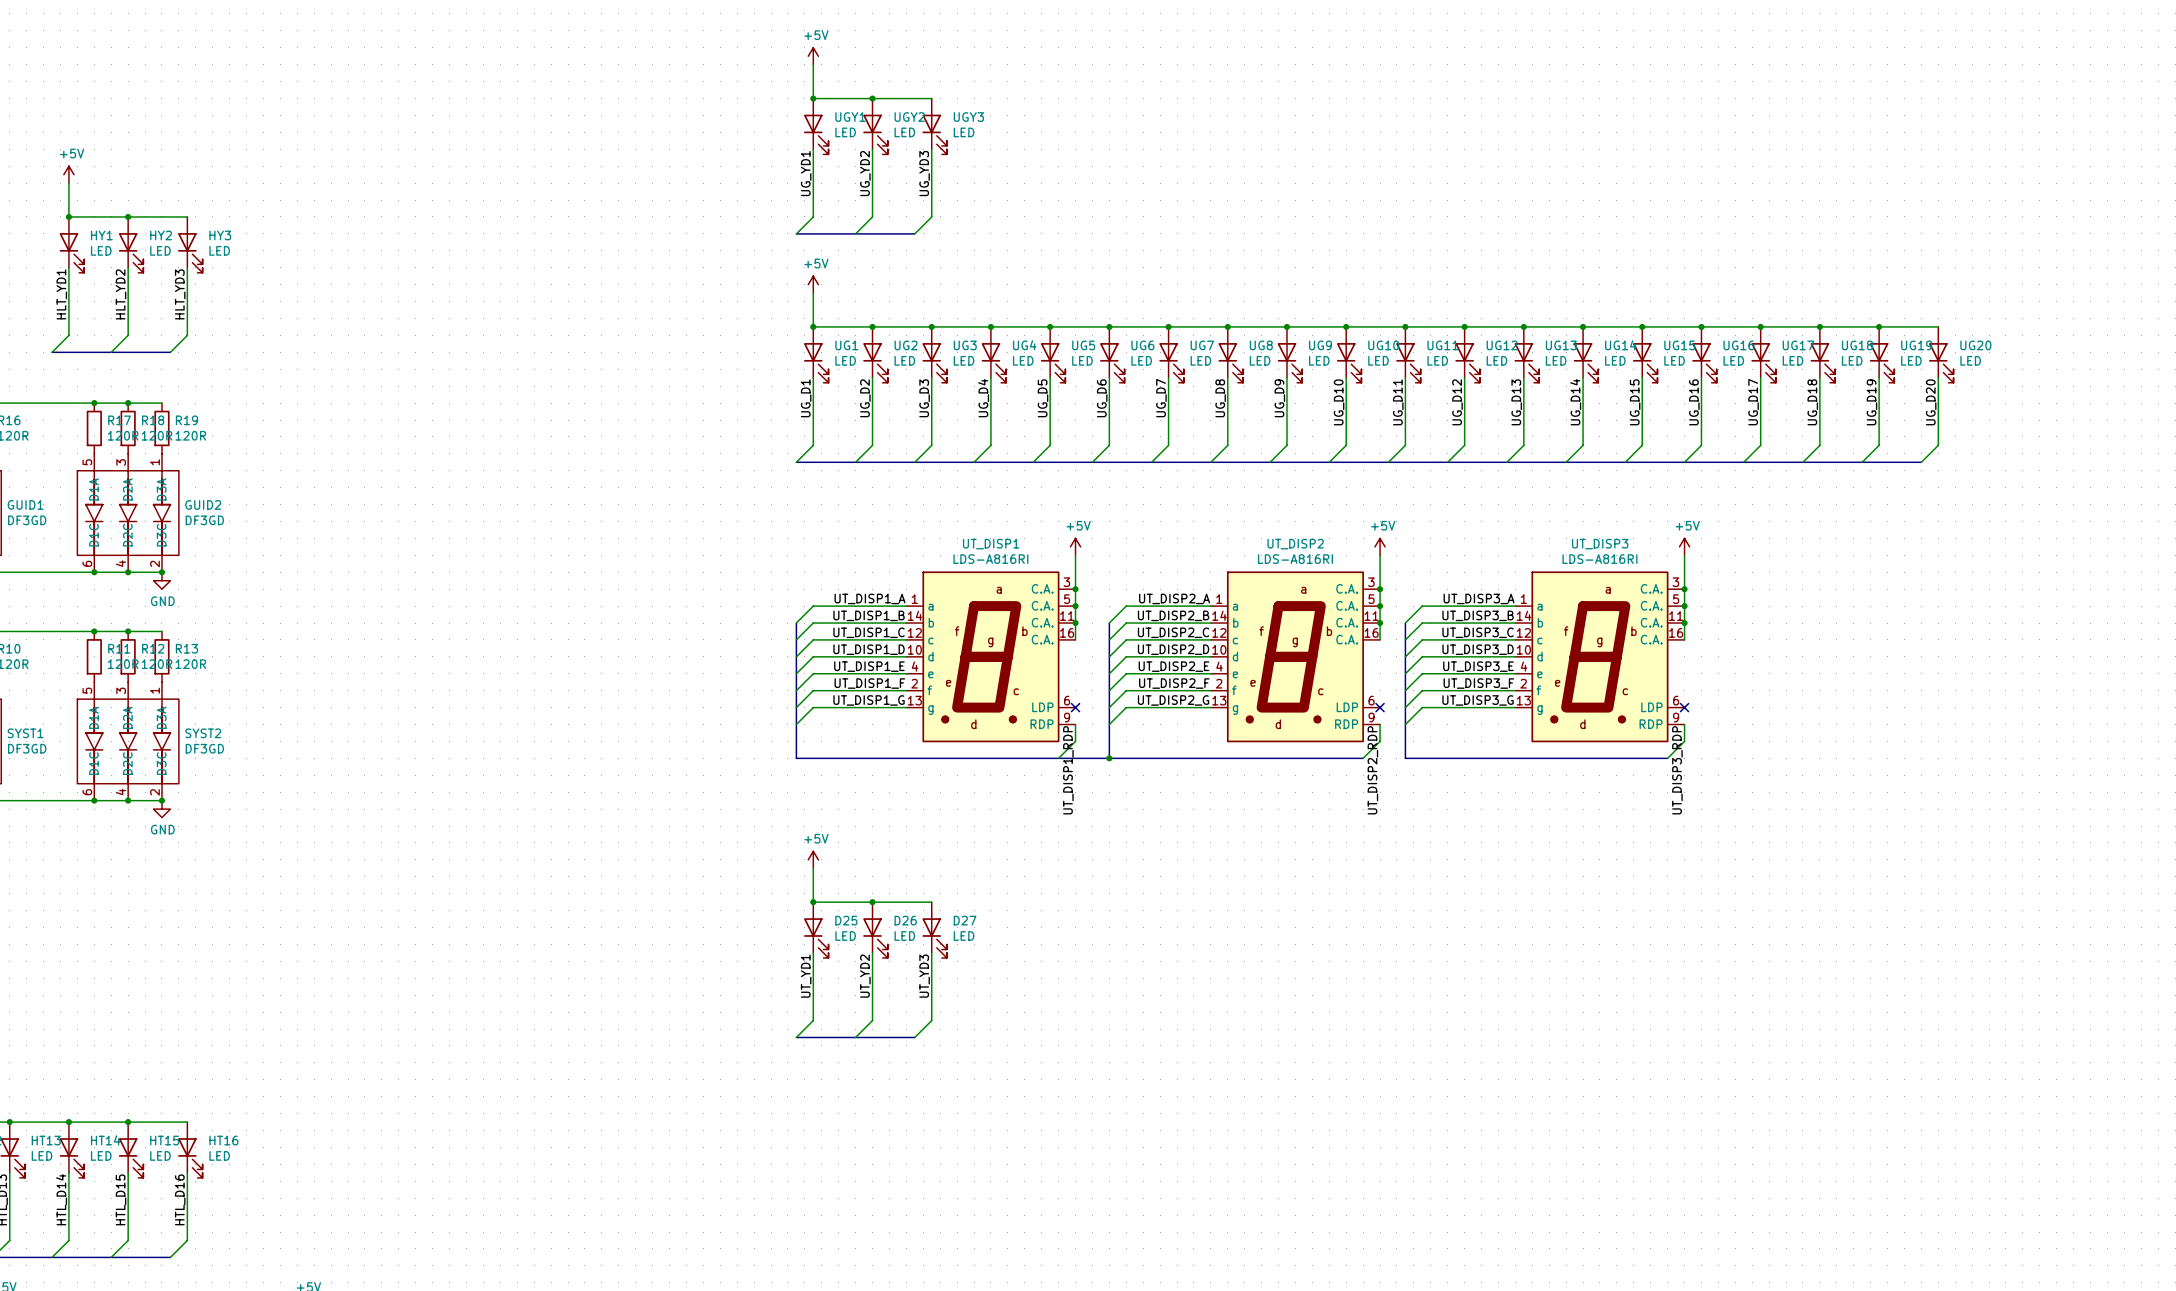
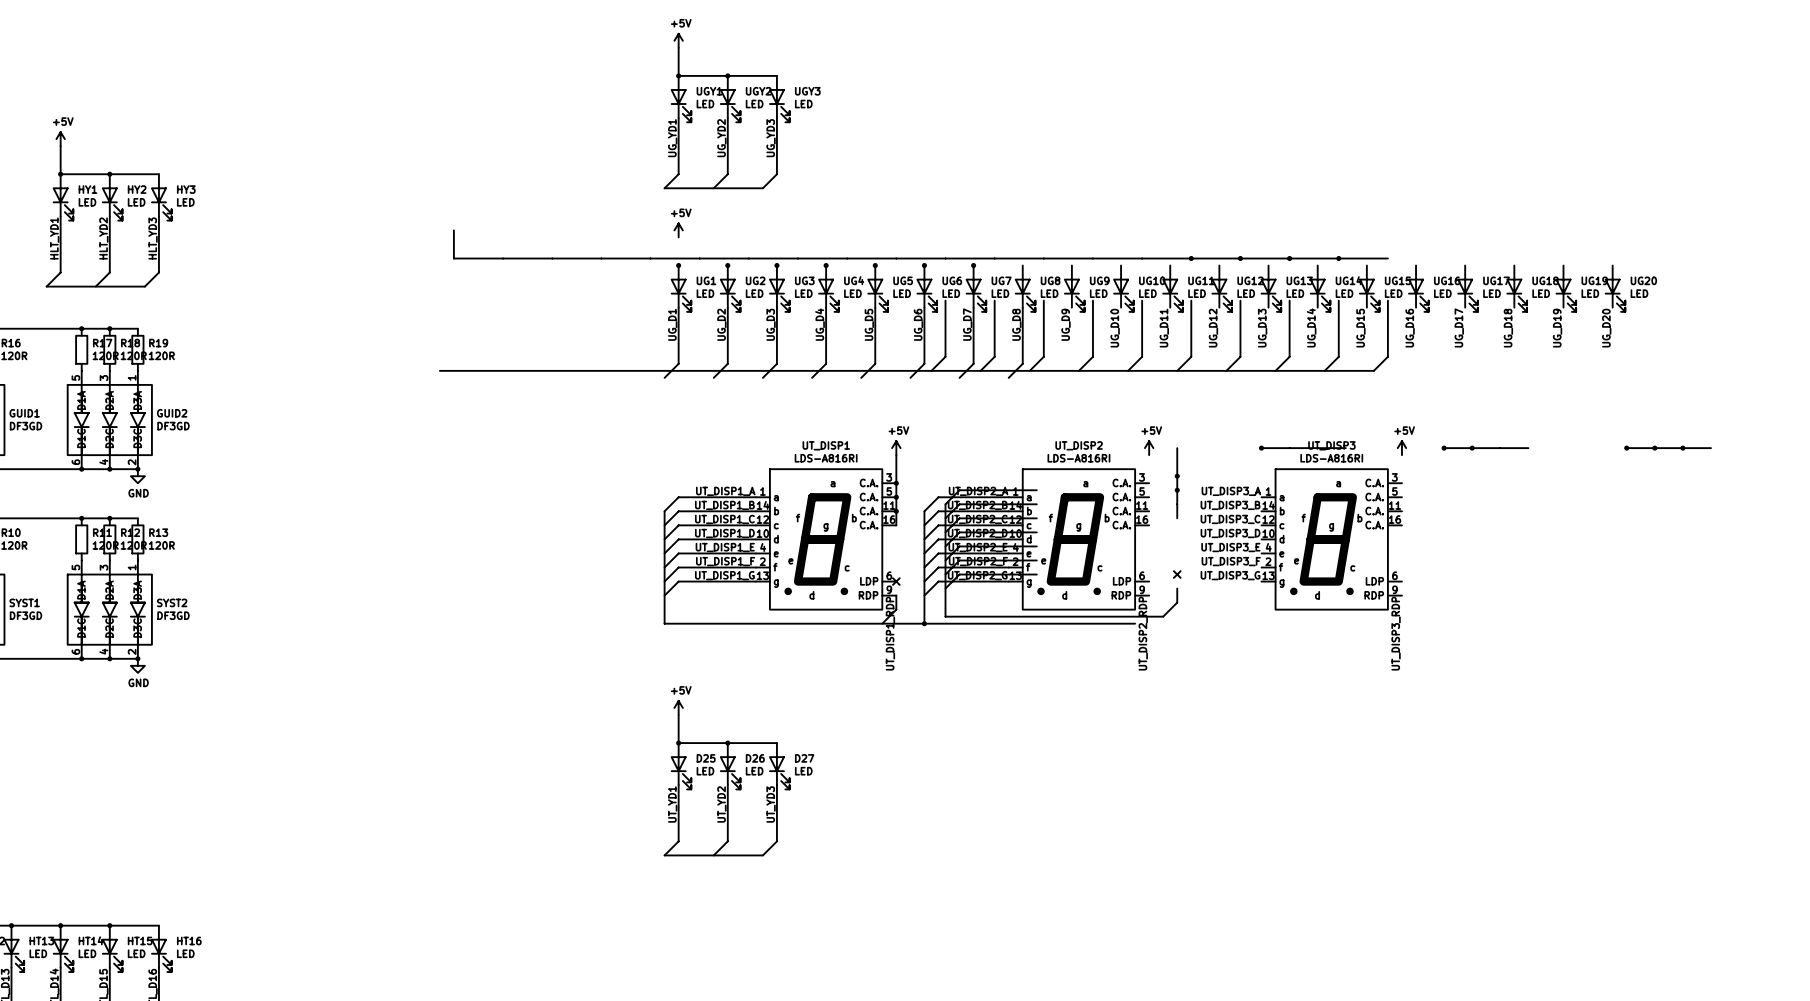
wire: none -> (453, 230) (453, 258) (1387, 258)
wire: (813, 293) (813, 326) (1938, 326) -> none
junction: none -> (1191, 258)
junction: none -> (1240, 258)
junction: none -> (1289, 258)
junction: none -> (1338, 258)
junction: (1227, 326) -> none
junction: (1286, 326) -> none
junction: (1346, 326) -> none
junction: (1405, 326) -> none
junction: (1464, 326) -> none
junction: (1523, 326) -> none
junction: (1583, 326) -> none
junction: (1642, 326) -> none
junction: (1701, 326) -> none
junction: (1760, 326) -> none
junction: (1819, 326) -> none
junction: (1879, 326) -> none
wire: (1286, 377) (1286, 445) (1270, 462) -> (945, 300) (945, 356) (931, 370)
wire: (1346, 377) (1346, 445) (1329, 462) -> (994, 300) (994, 356) (980, 370)
wire: (1405, 377) (1405, 445) (1388, 462) -> (1043, 300) (1043, 356) (1029, 370)
wire: (1464, 377) (1464, 445) (1447, 462) -> (1092, 300) (1092, 356) (1078, 370)
wire: (1523, 377) (1523, 445) (1506, 462) -> (1142, 300) (1142, 356) (1128, 370)
wire: (1583, 377) (1583, 445) (1566, 462) -> (1191, 300) (1191, 356) (1177, 370)
wire: (1642, 377) (1642, 445) (1625, 462) -> (1240, 300) (1240, 356) (1226, 370)
wire: (1701, 377) (1701, 445) (1684, 462) -> (1289, 300) (1289, 356) (1275, 370)
wire: (1760, 377) (1760, 445) (1743, 462) -> (1338, 300) (1338, 356) (1324, 370)
wire: (1819, 377) (1819, 445) (1802, 462) -> (1387, 300) (1387, 356) (1373, 370)
wire: (1879, 377) (1879, 445) (1862, 462) -> none
wire: (1938, 377) (1938, 445) (1921, 462) -> none
bus: none -> (439, 370) (1373, 370)
bus: (796, 462) (1921, 462) -> none
wire: none -> (1261, 448) (1345, 448)
junction: none -> (1261, 448)
wire: none -> (1444, 448) (1528, 448)
junction: none -> (1444, 448)
junction: none -> (1472, 448)
wire: none -> (1626, 448) (1710, 448)
junction: none -> (1626, 448)
junction: none -> (1654, 448)
junction: none -> (1682, 448)
wire: (1380, 555) (1380, 639) -> (1177, 448) (1177, 518)
wire: (1684, 555) (1684, 639) -> none
junction: none -> (1177, 476)
junction: (1380, 589) -> none
junction: (1684, 589) -> none
wire: none -> (1036, 490) (959, 490) (945, 504)
junction: none -> (1177, 490)
junction: (1380, 606) -> none
wire: (1515, 606) (1422, 606) (1405, 623) -> none
junction: (1684, 606) -> none
bus: none -> (945, 504) (945, 616) (1163, 616)
wire: none -> (1036, 504) (959, 504) (945, 518)
junction: (1380, 623) -> none
bus: (1405, 623) (1405, 758) (1667, 758) -> none
wire: (1515, 623) (1422, 623) (1405, 639) -> none
junction: (1684, 623) -> none
wire: none -> (1036, 518) (959, 518) (945, 532)
wire: (1515, 639) (1422, 639) (1405, 656) -> none
wire: none -> (1036, 532) (959, 532) (945, 546)
wire: (1515, 656) (1422, 656) (1405, 673) -> none
wire: none -> (1036, 546) (959, 546) (945, 560)
wire: (1515, 673) (1422, 673) (1405, 690) -> none
wire: none -> (1036, 560) (959, 560) (945, 574)
wire: (1515, 690) (1422, 690) (1405, 707) -> none
wire: none -> (1036, 574) (959, 574) (945, 588)
no-connect mark position: (1380, 707) -> (1177, 574)
wire: (1515, 707) (1422, 707) (1405, 724) -> none
no-connect mark: (1684, 707) -> none
wire: (1380, 724) (1380, 741) (1363, 758) -> (1177, 588) (1177, 602) (1163, 616)
wire: (1684, 724) (1684, 741) (1667, 758) -> none

